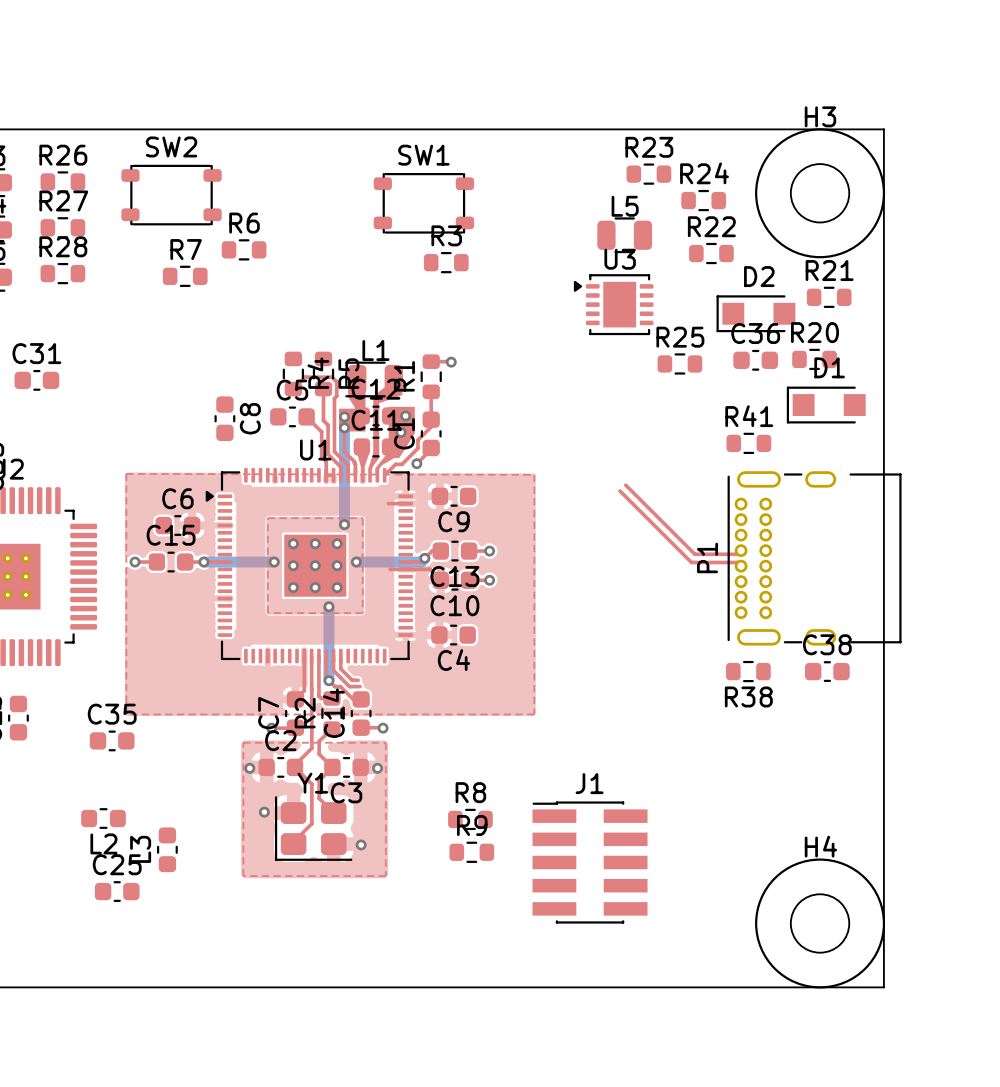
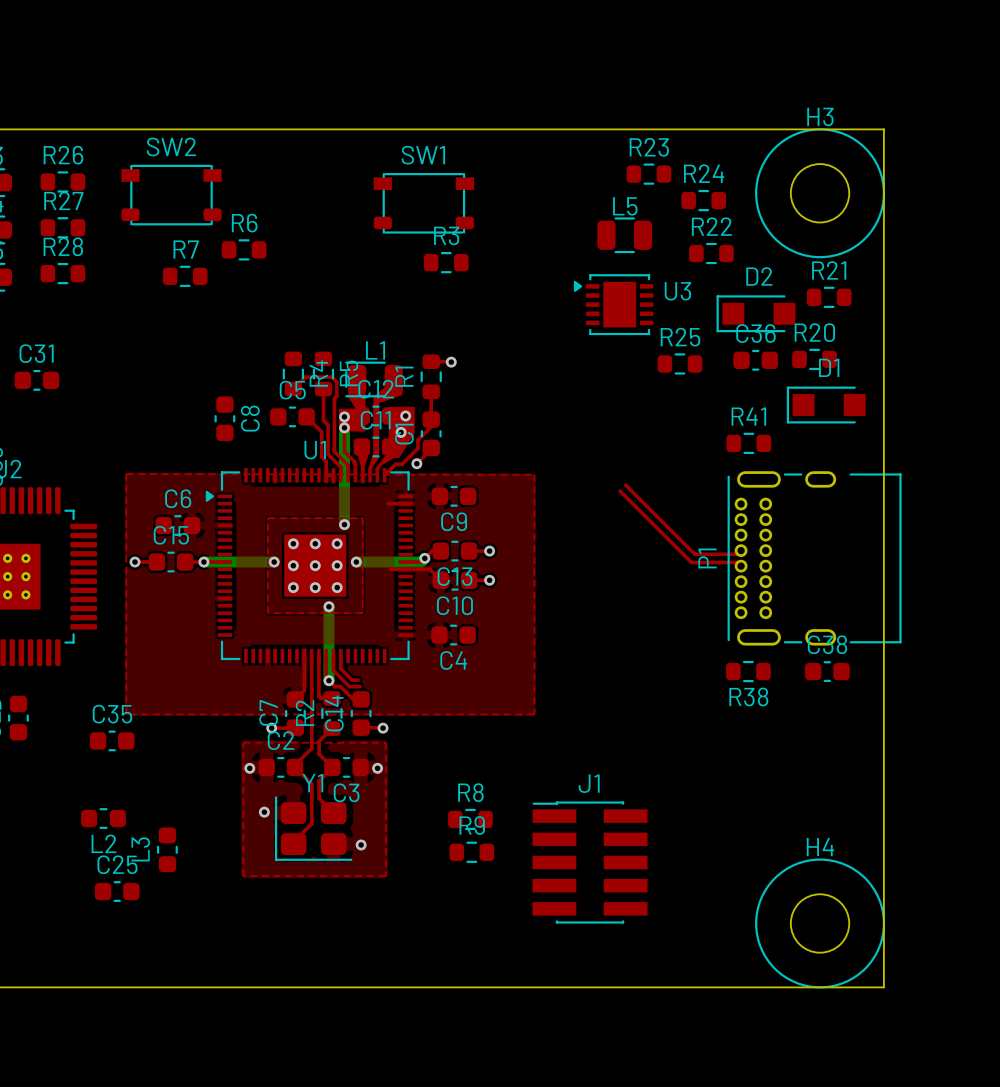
SW2 footprint: [121, 164, 222, 226] -> [121, 164, 222, 226]
SW1 footprint: [373, 173, 475, 234] -> [373, 173, 475, 234]
U3 name position: U3 (620, 259) -> U3 (677, 291)

